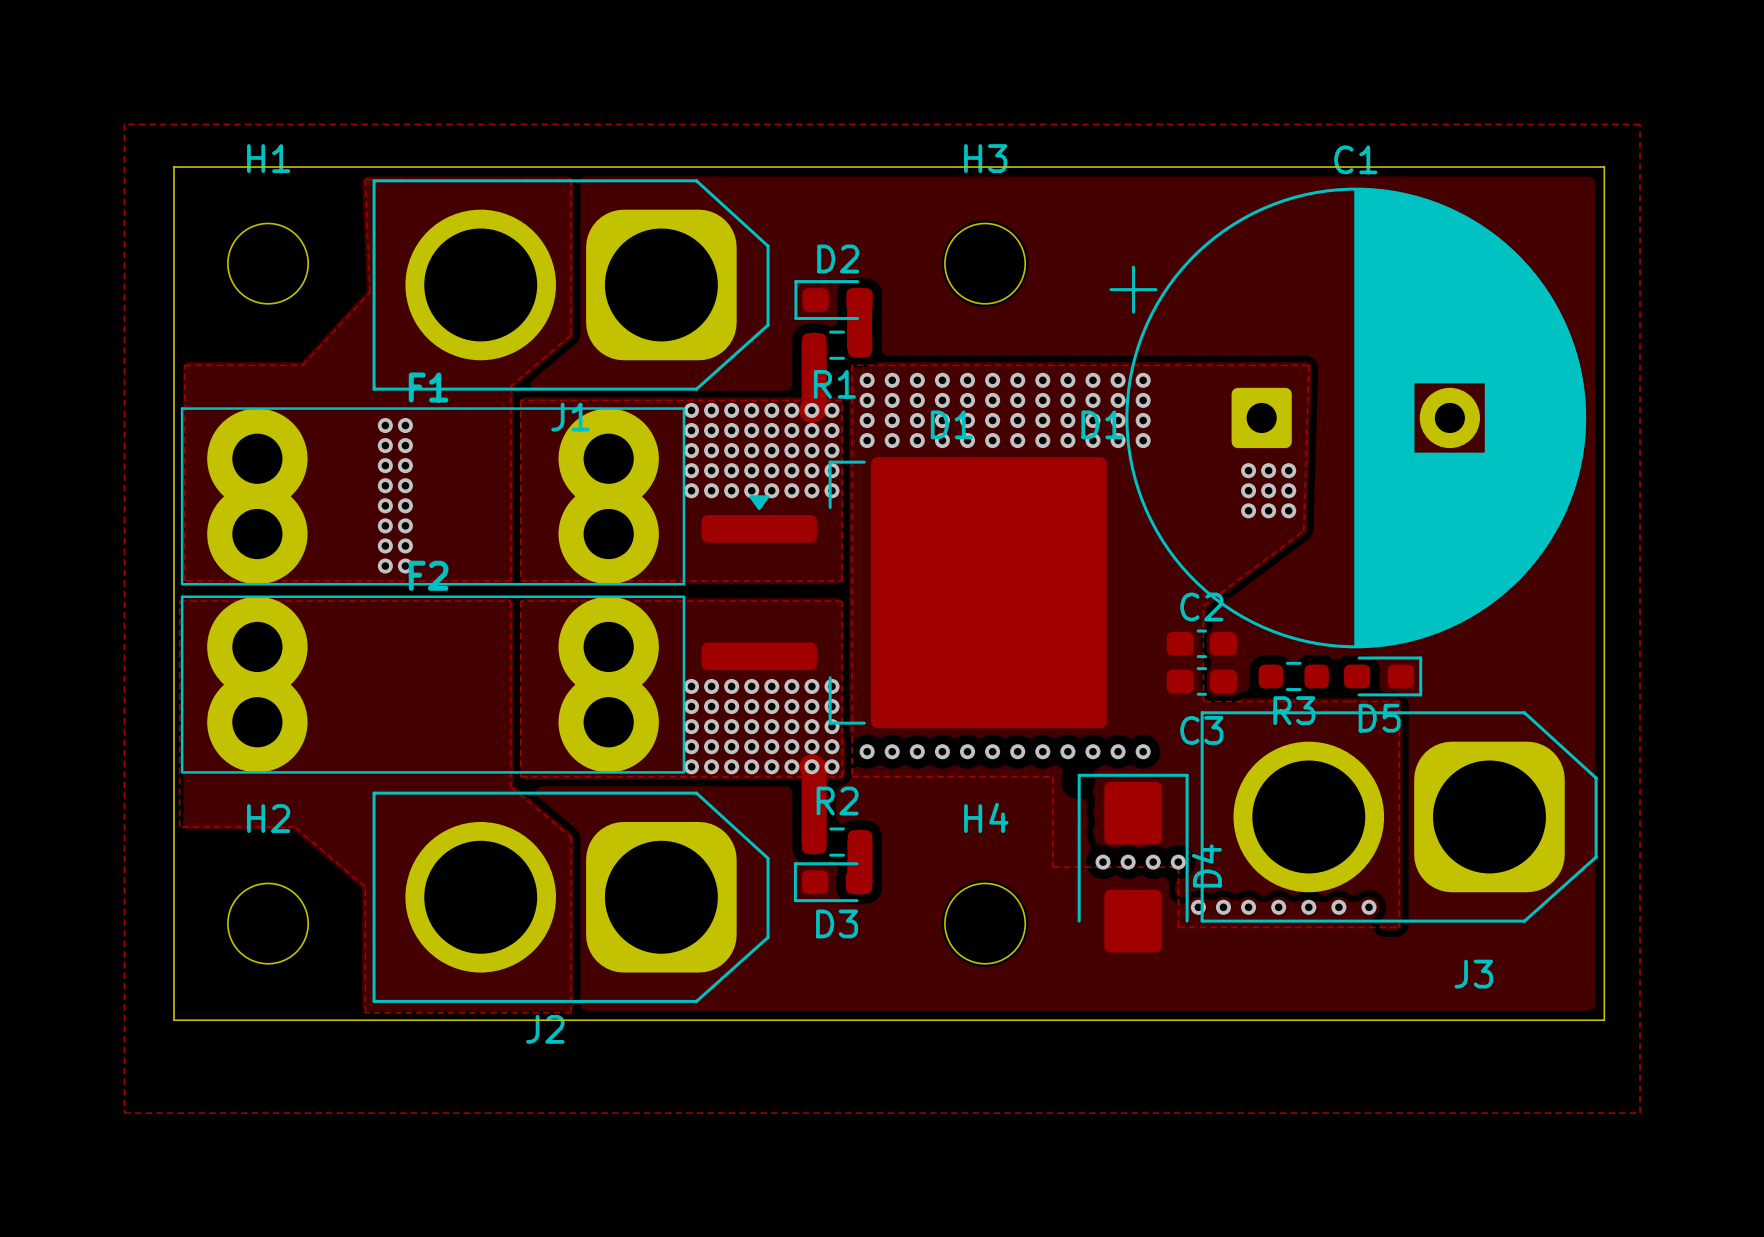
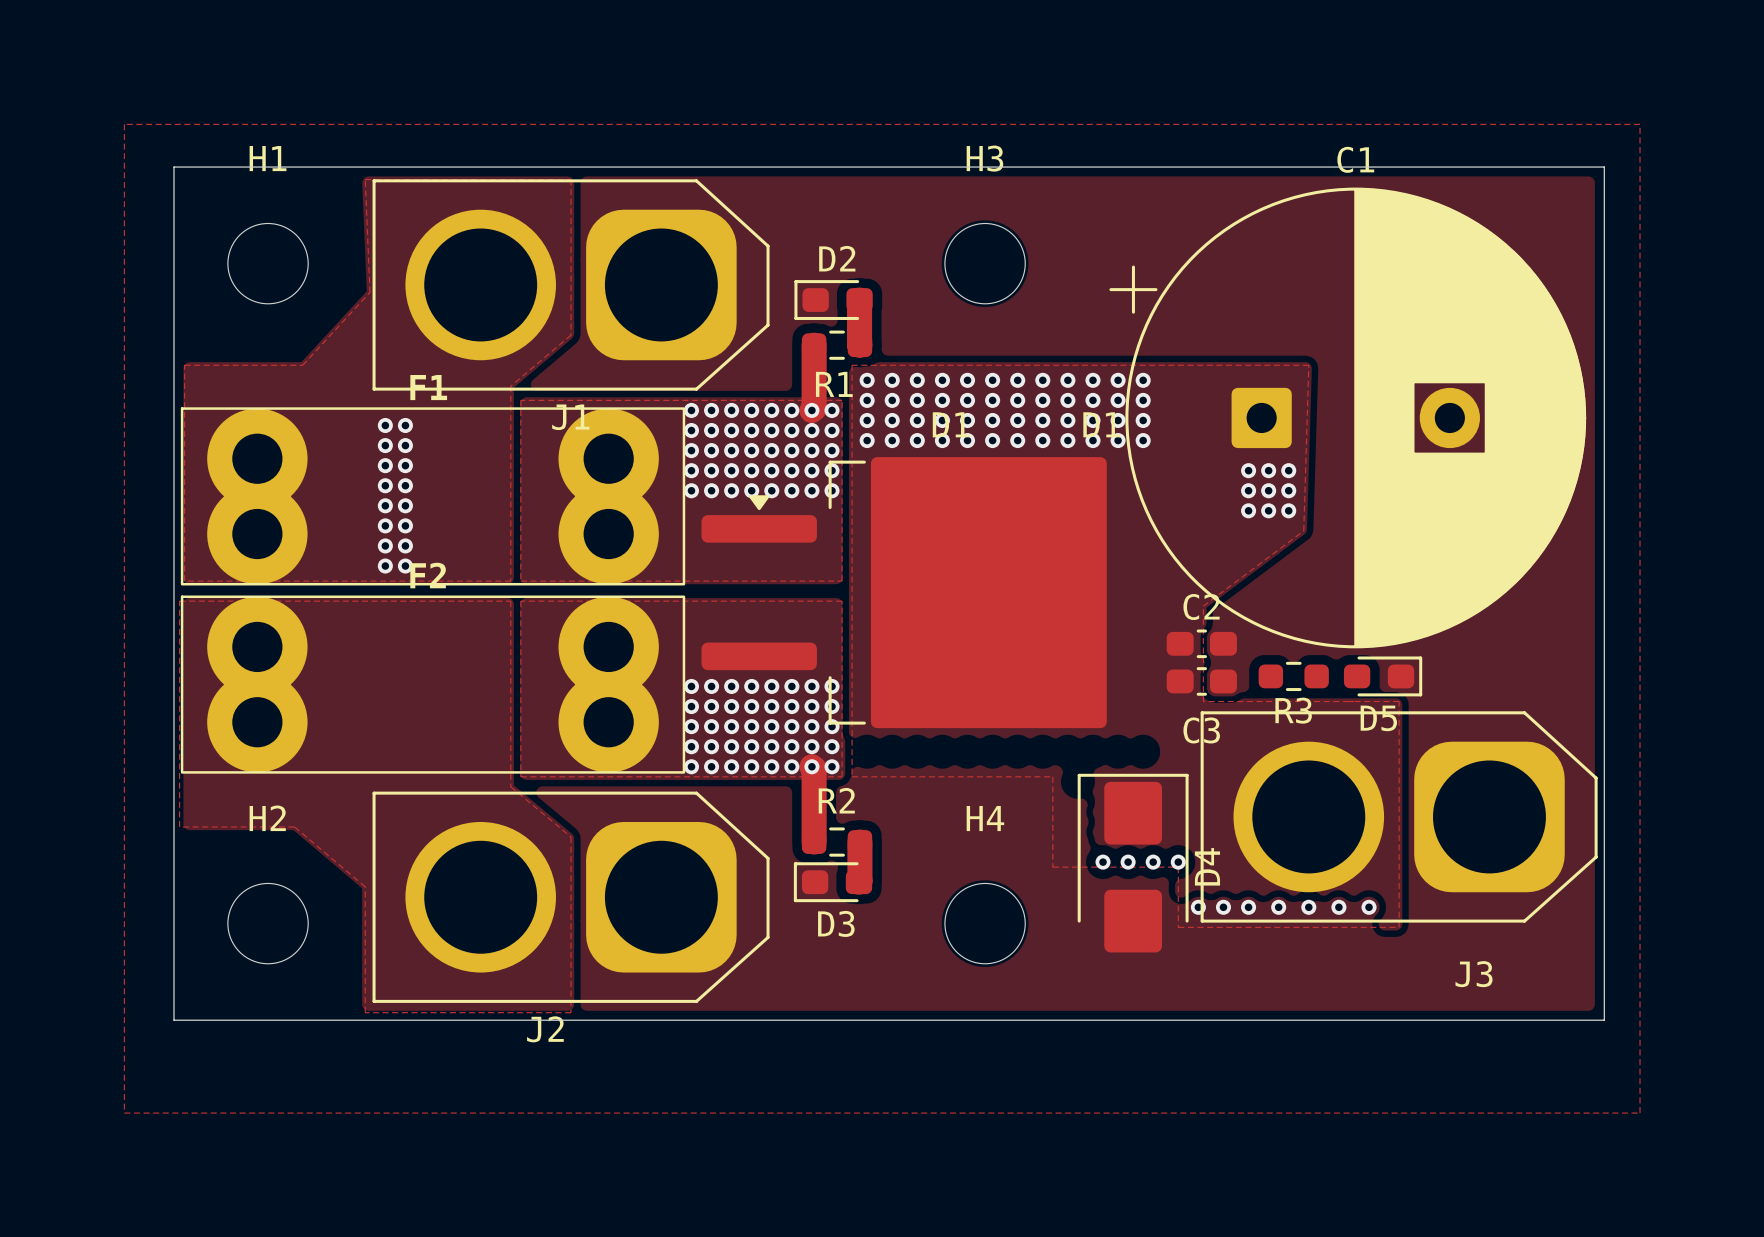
via: (867, 751) -> none
via: (892, 751) -> none
via: (917, 751) -> none
via: (942, 751) -> none
via: (967, 751) -> none
via: (992, 751) -> none
via: (1017, 751) -> none
via: (1042, 751) -> none
via: (1067, 751) -> none
via: (1092, 751) -> none
via: (1118, 751) -> none
via: (1143, 751) -> none

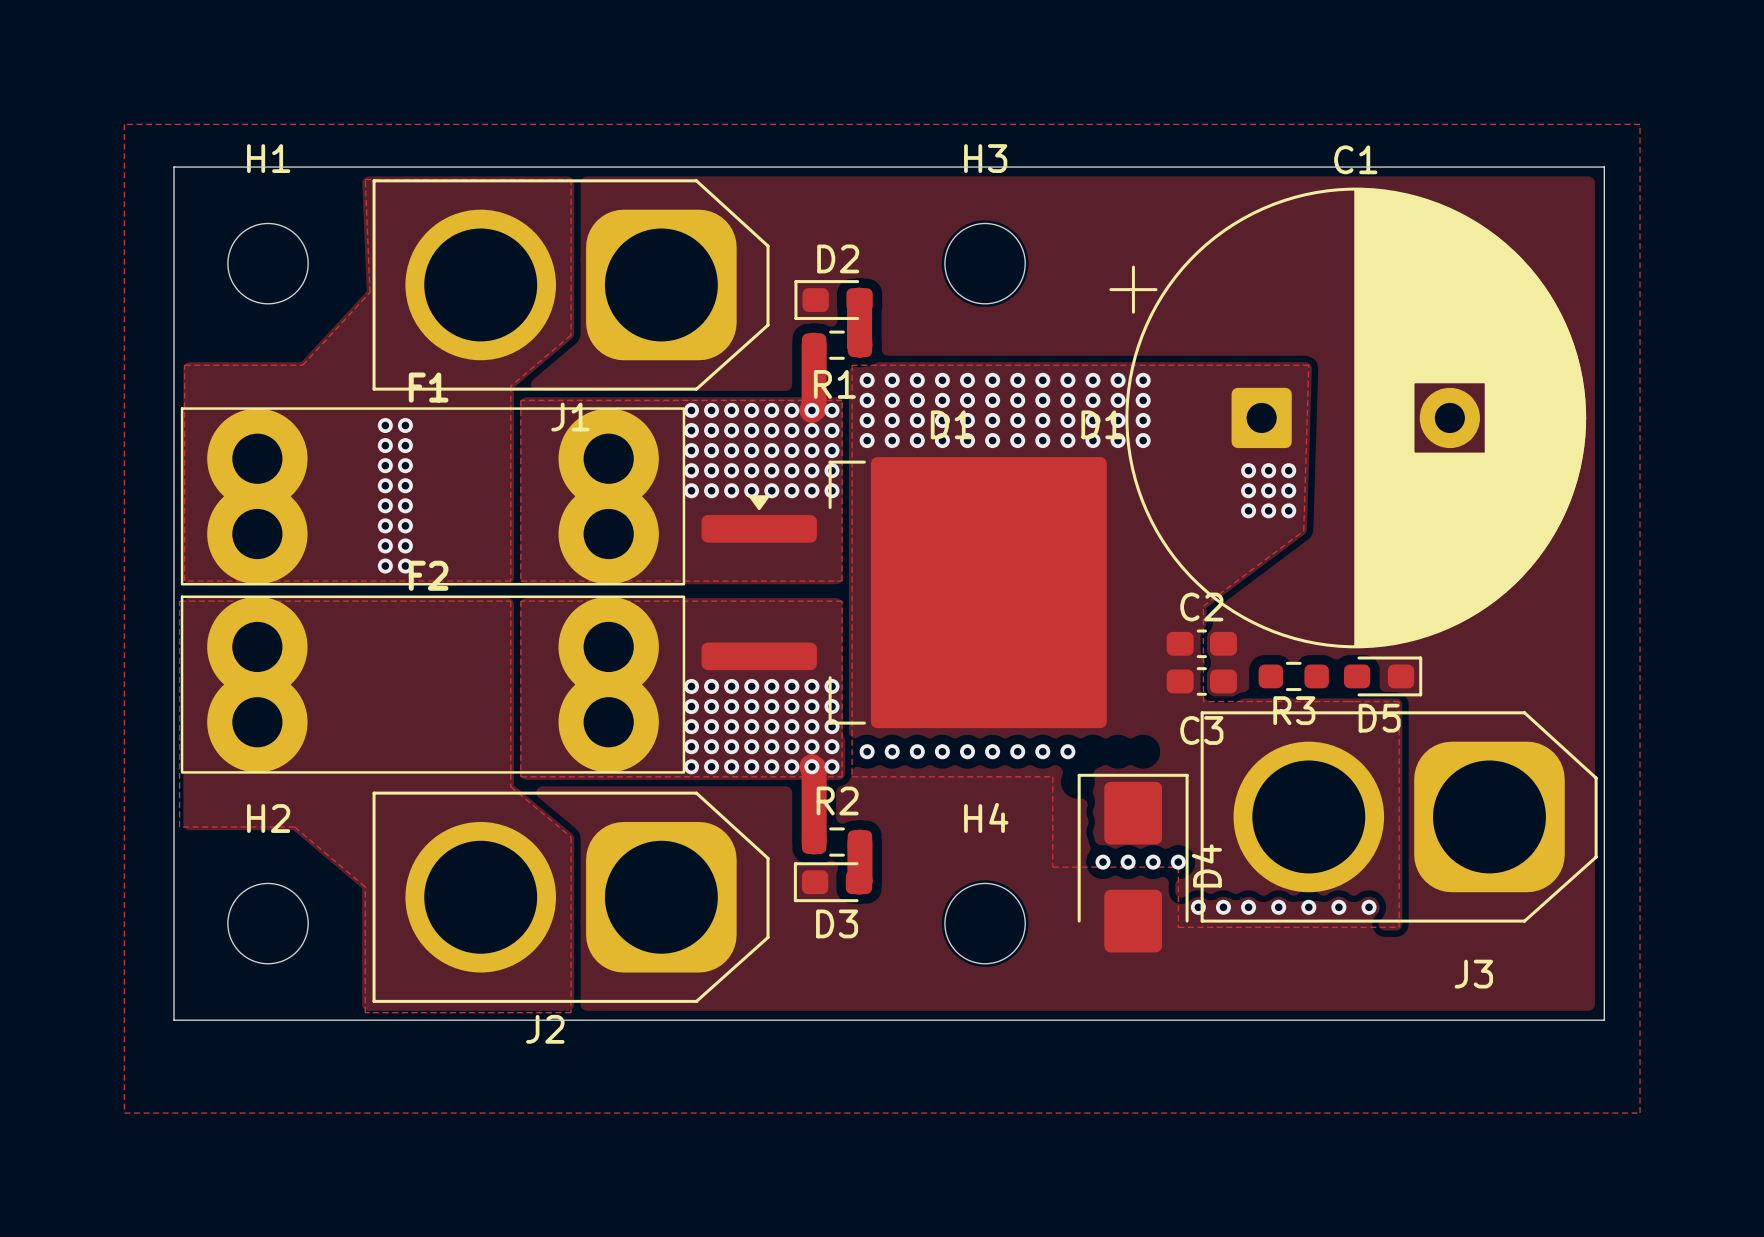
via: none -> (867, 751)
via: none -> (892, 751)
via: none -> (917, 751)
via: none -> (942, 751)
via: none -> (967, 751)
via: none -> (992, 751)
via: none -> (1017, 751)
via: none -> (1042, 751)
via: none -> (1067, 751)

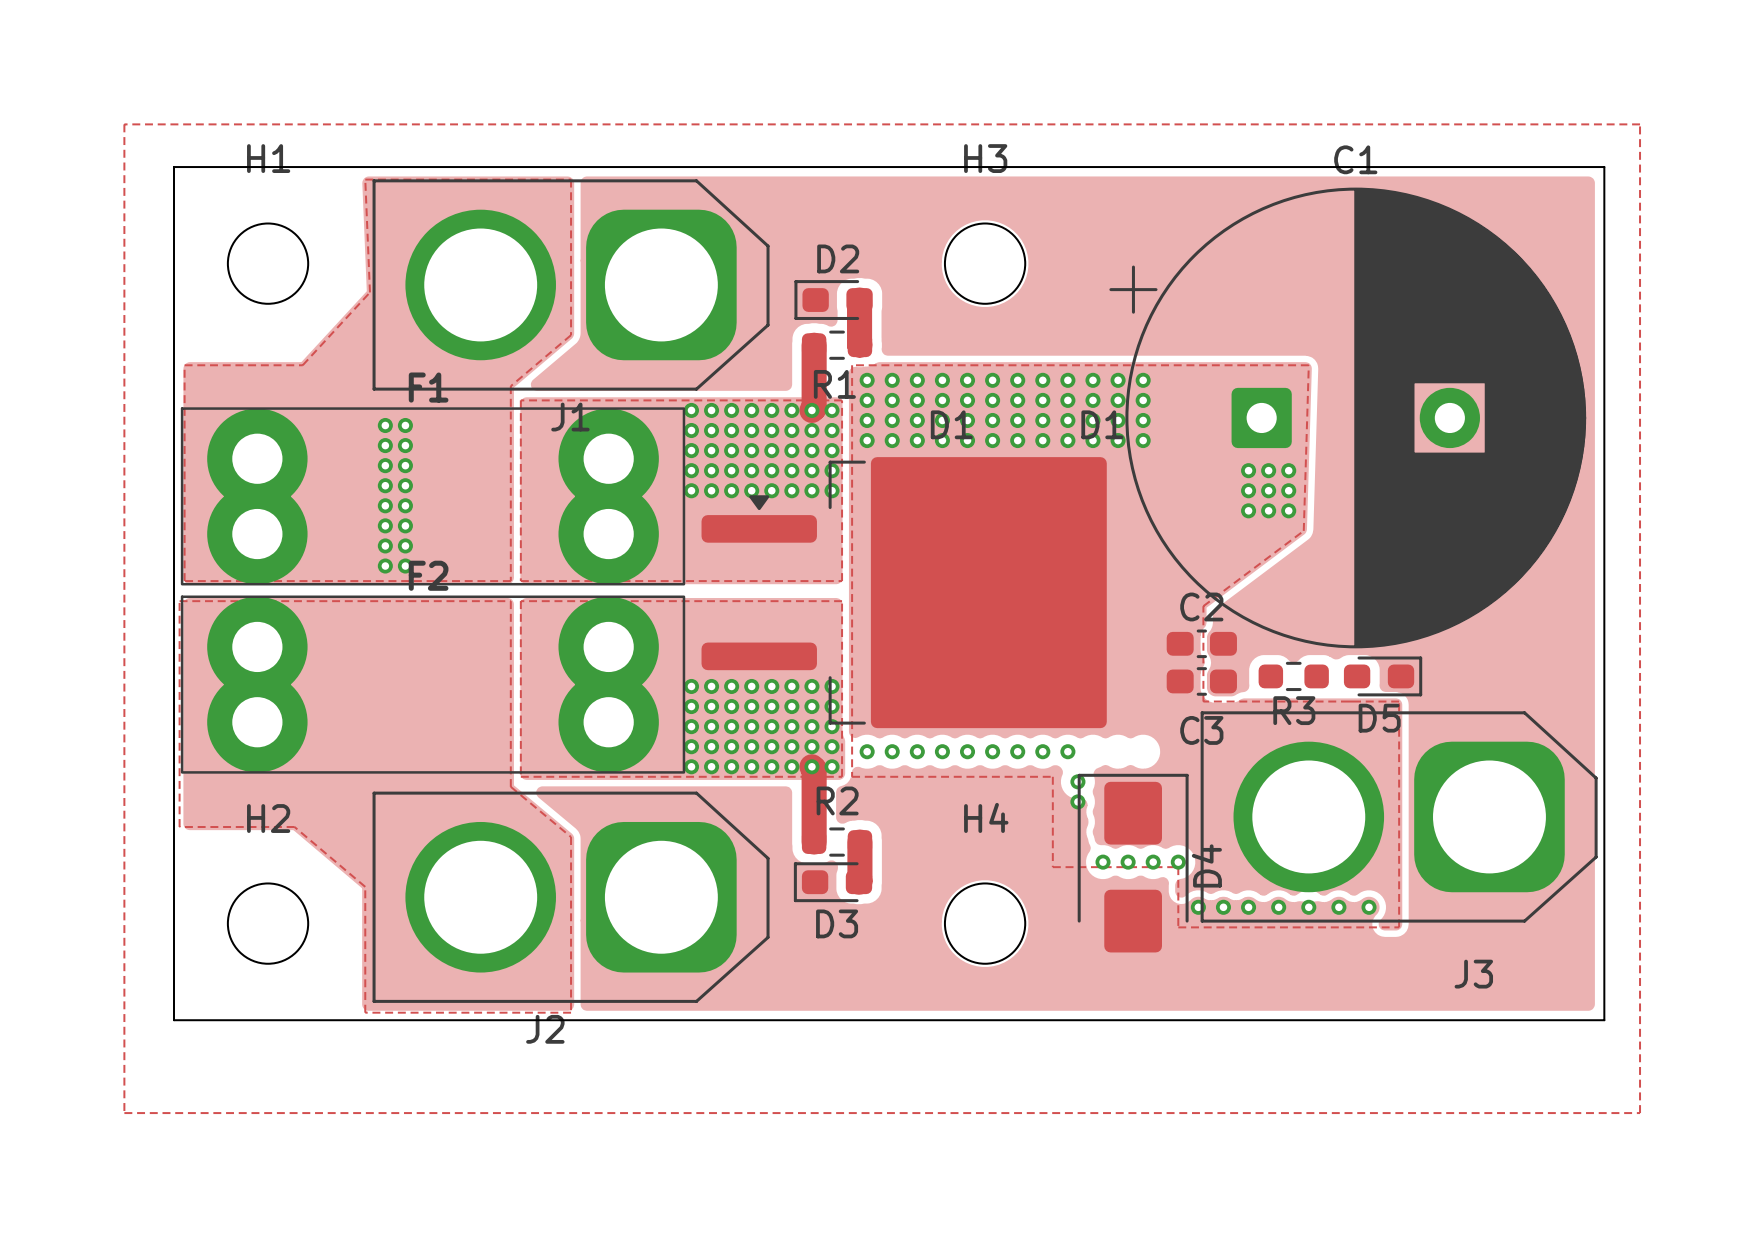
via: none -> (1077, 781)
via: none -> (1077, 801)

